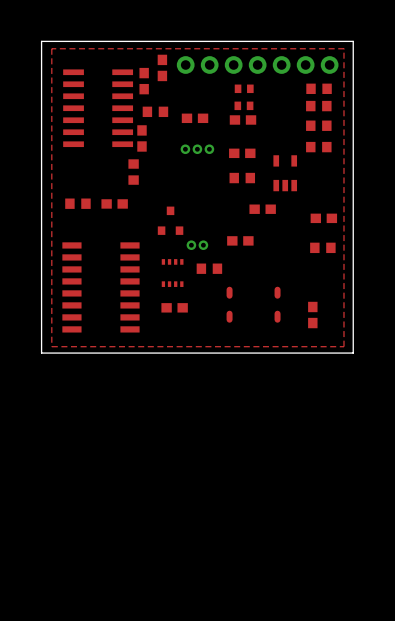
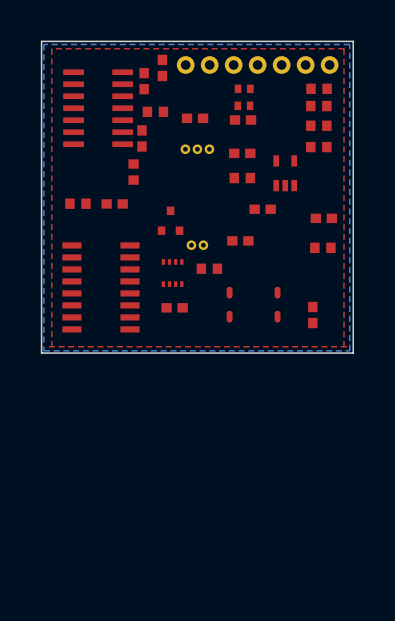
bottom zone outline: none -> (349, 44) (43, 44) (43, 350) (349, 350) (349, 44)

